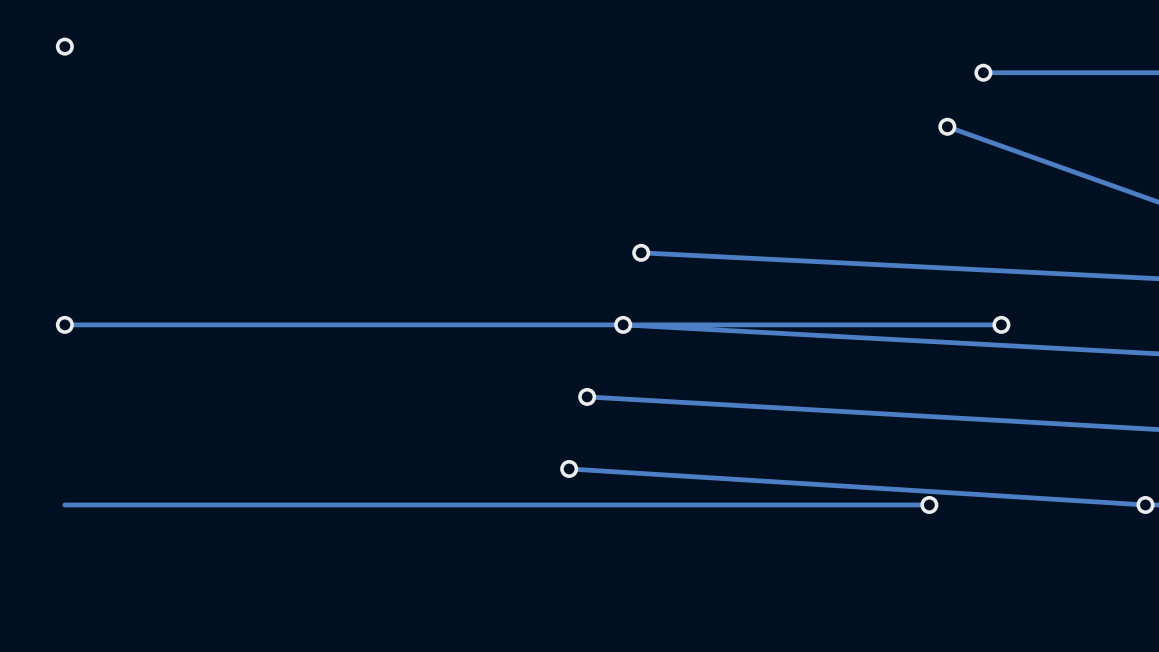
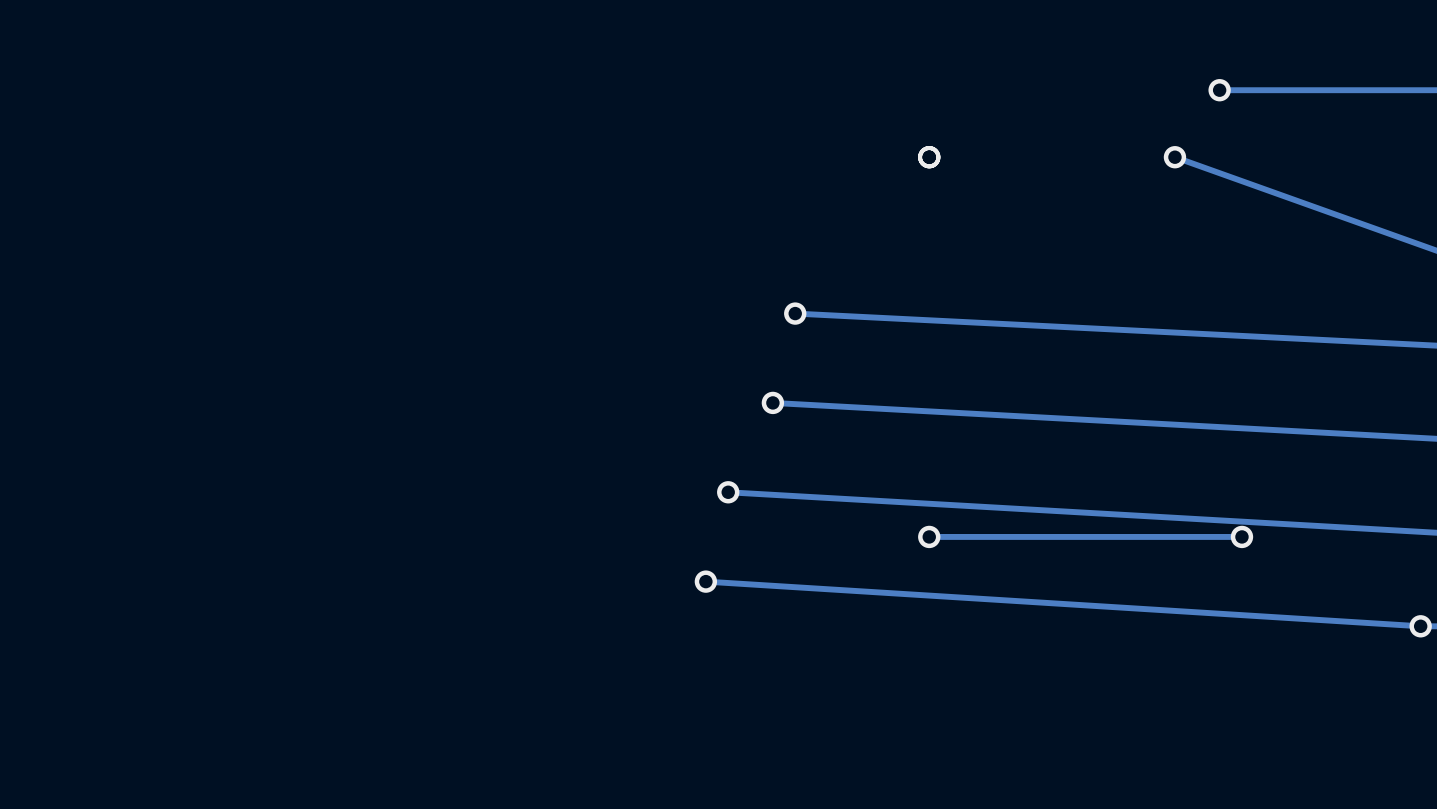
via: (64, 46) -> none
via: none -> (929, 157)
via: (64, 324) -> none
track: (1001, 324) (64, 324) -> none
via: (1001, 324) -> none
via: none -> (929, 536)
track: none -> (1241, 536) (929, 536)
via: none -> (1241, 536)
track: (929, 504) (64, 504) -> none
via: (929, 504) -> none

